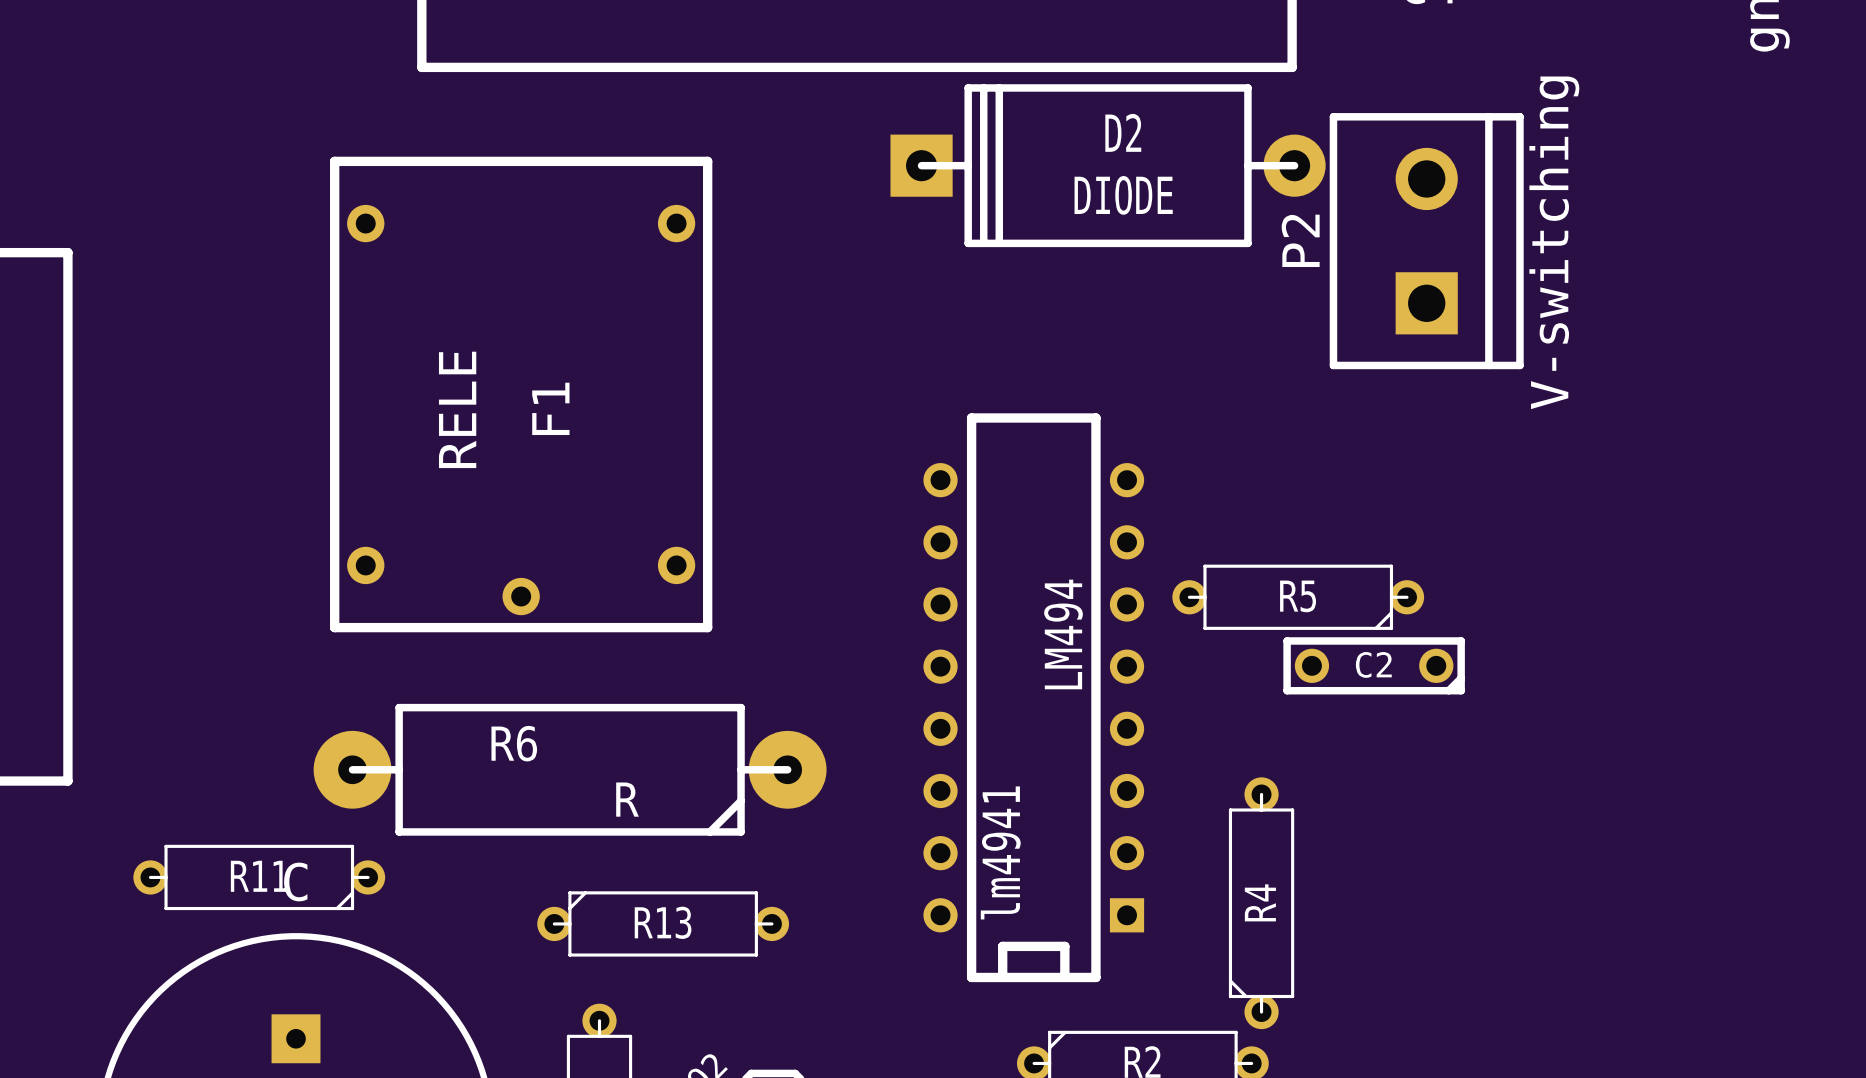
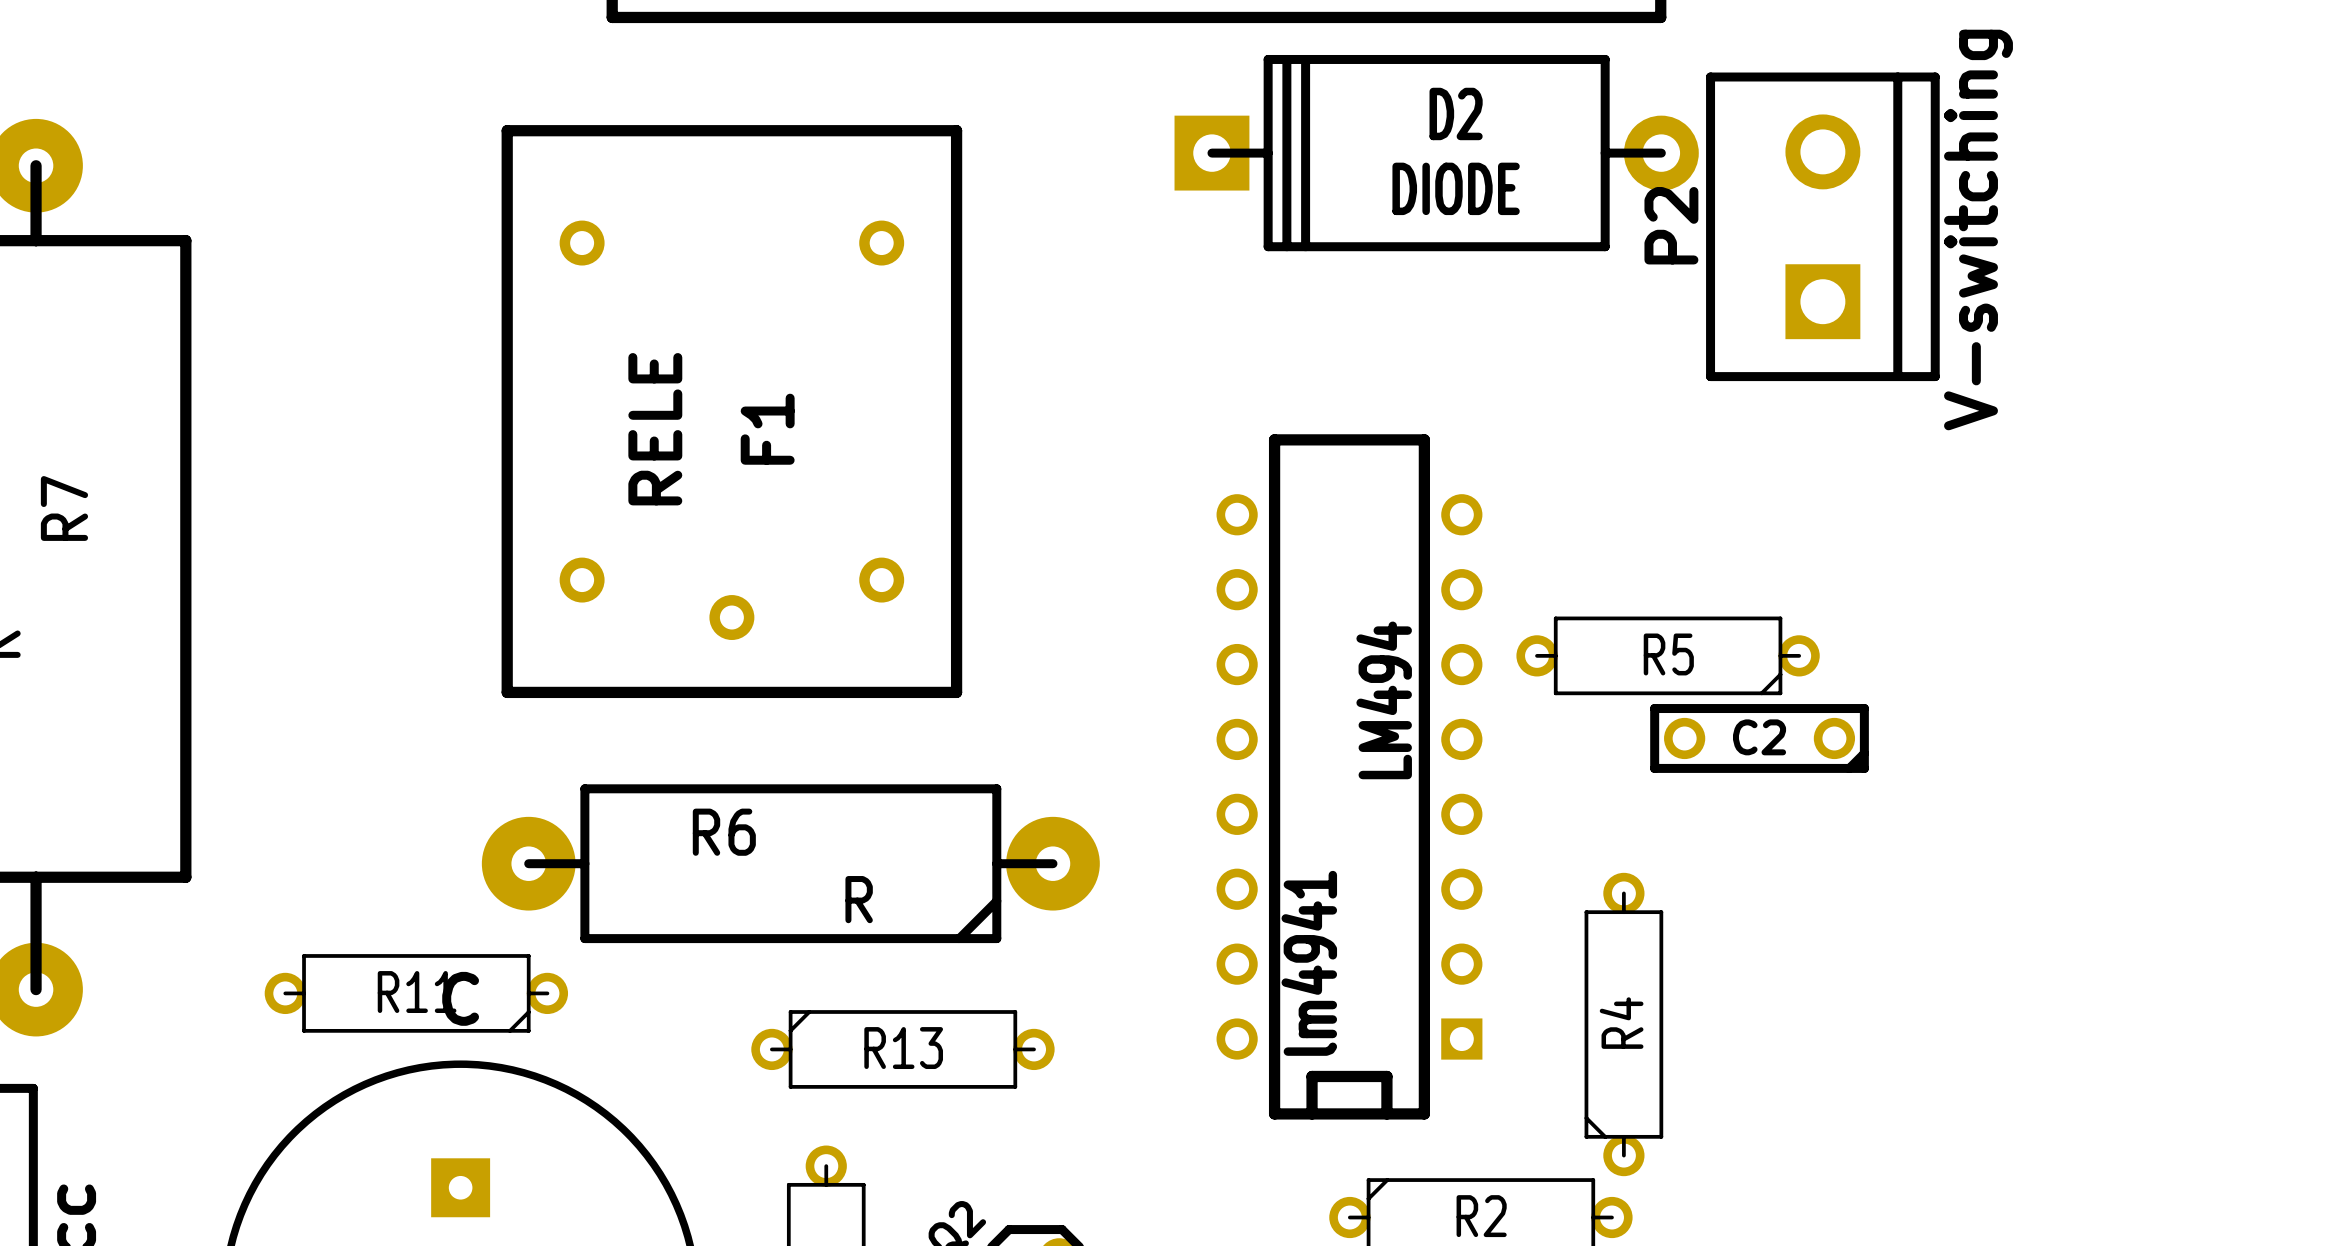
F1 footprint: [330, 156, 713, 633] -> [501, 125, 963, 699]
D2 position: (1108, 165) -> (1436, 153)

